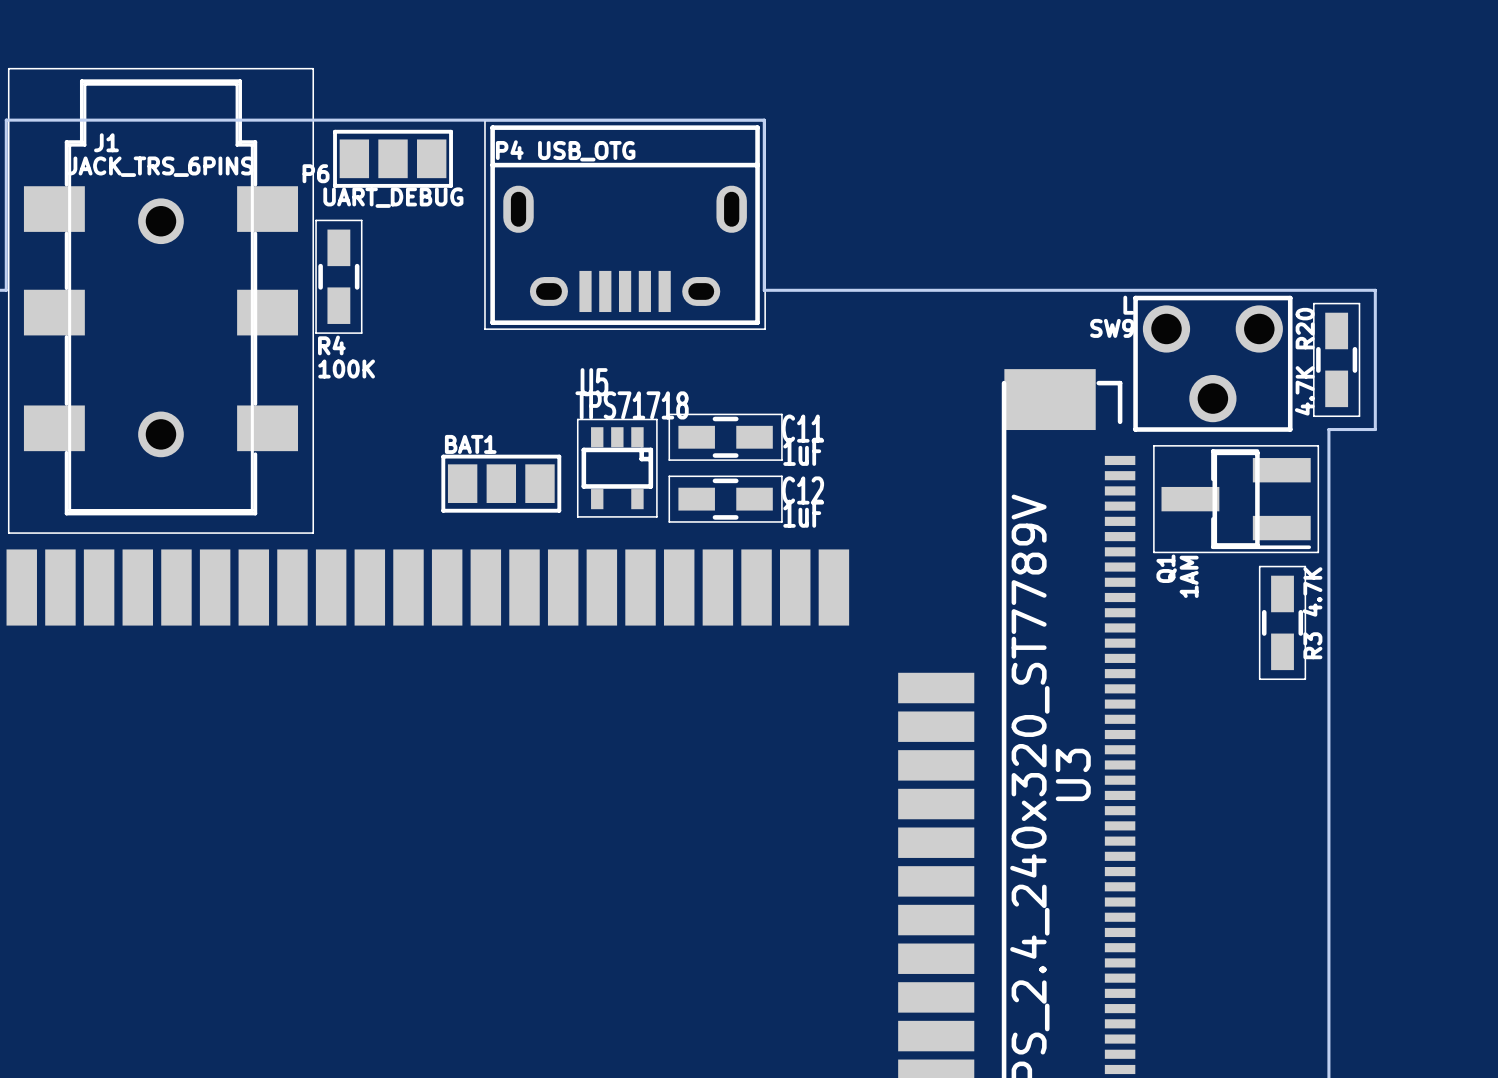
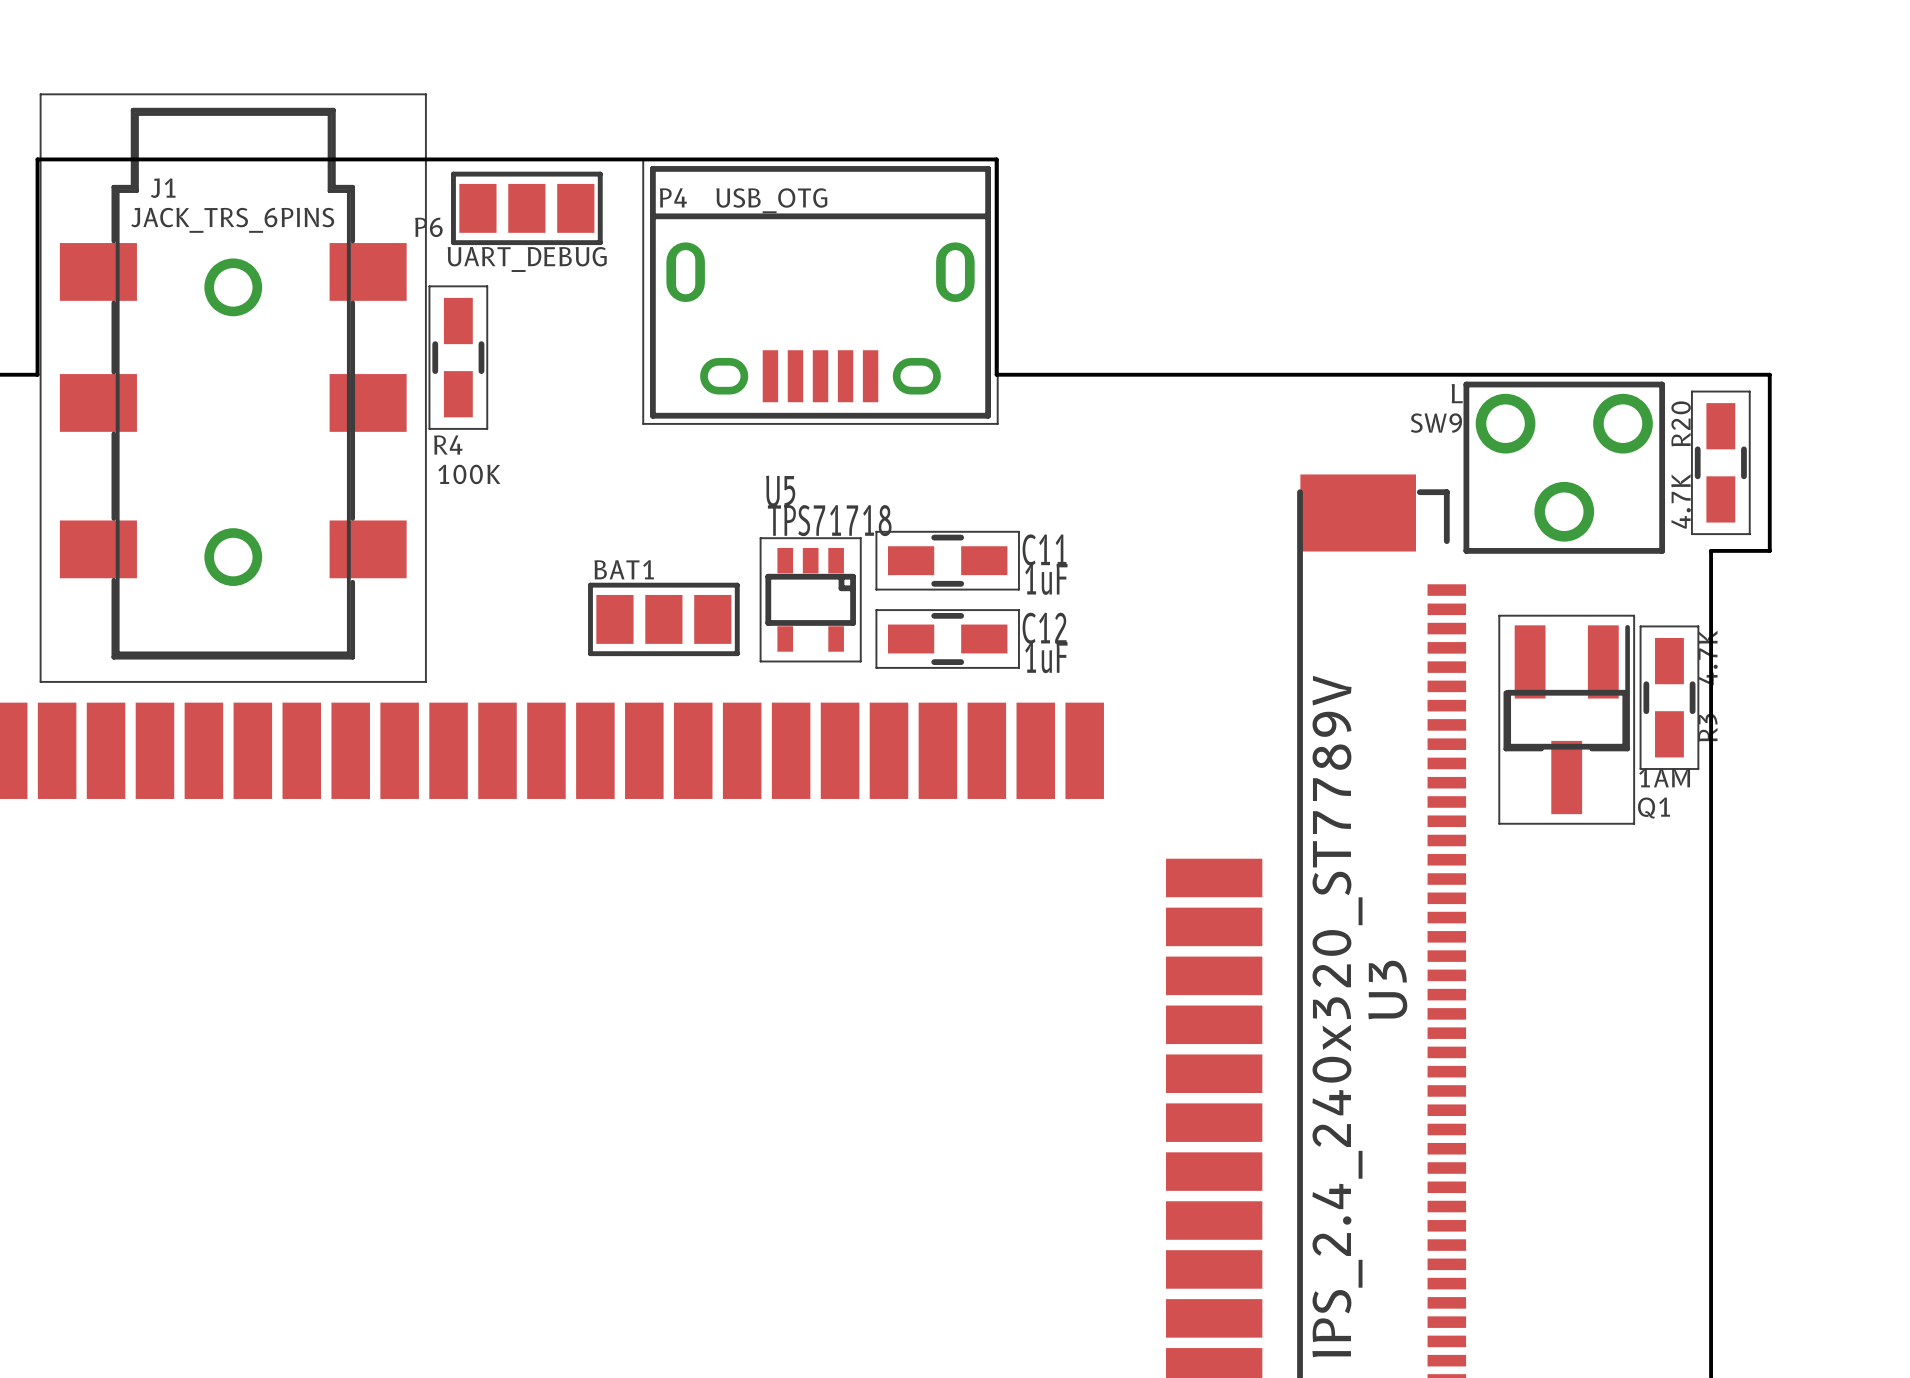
Q1 rotation: 0° (1236, 499) -> 90° counterclockwise (1566, 719)
R3 position: (1282, 622) -> (1669, 697)

